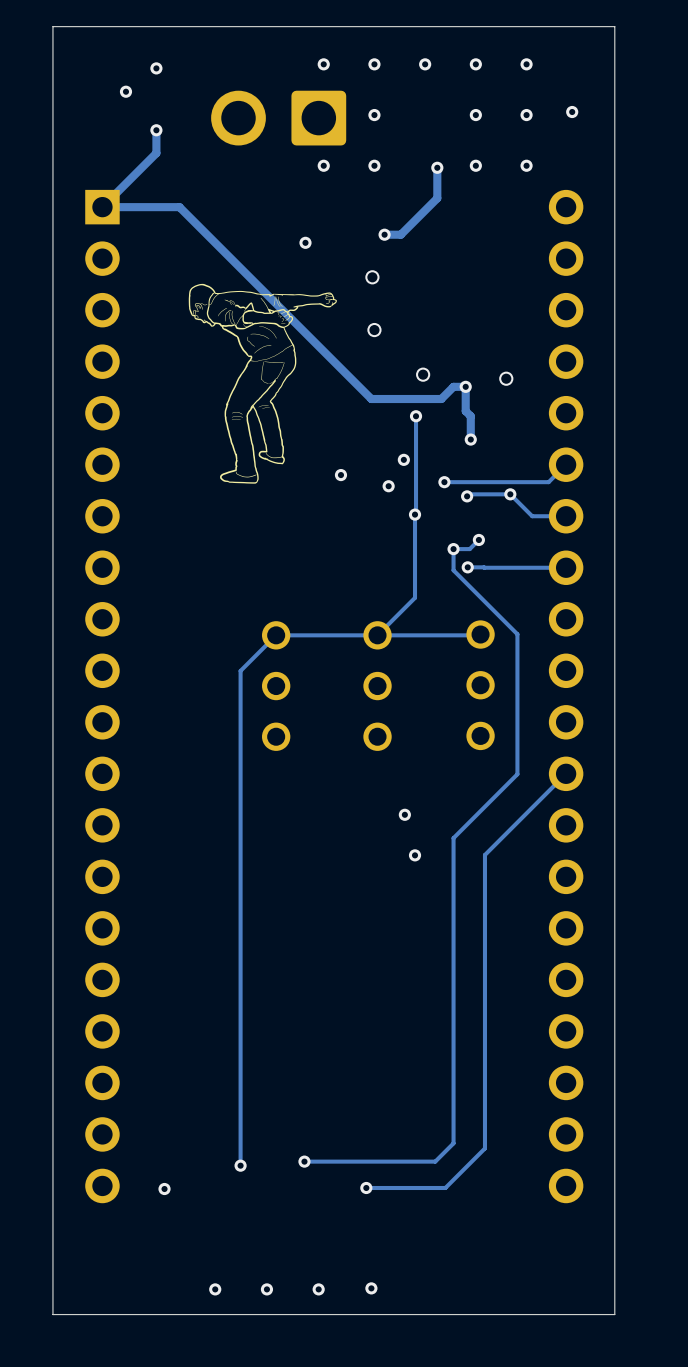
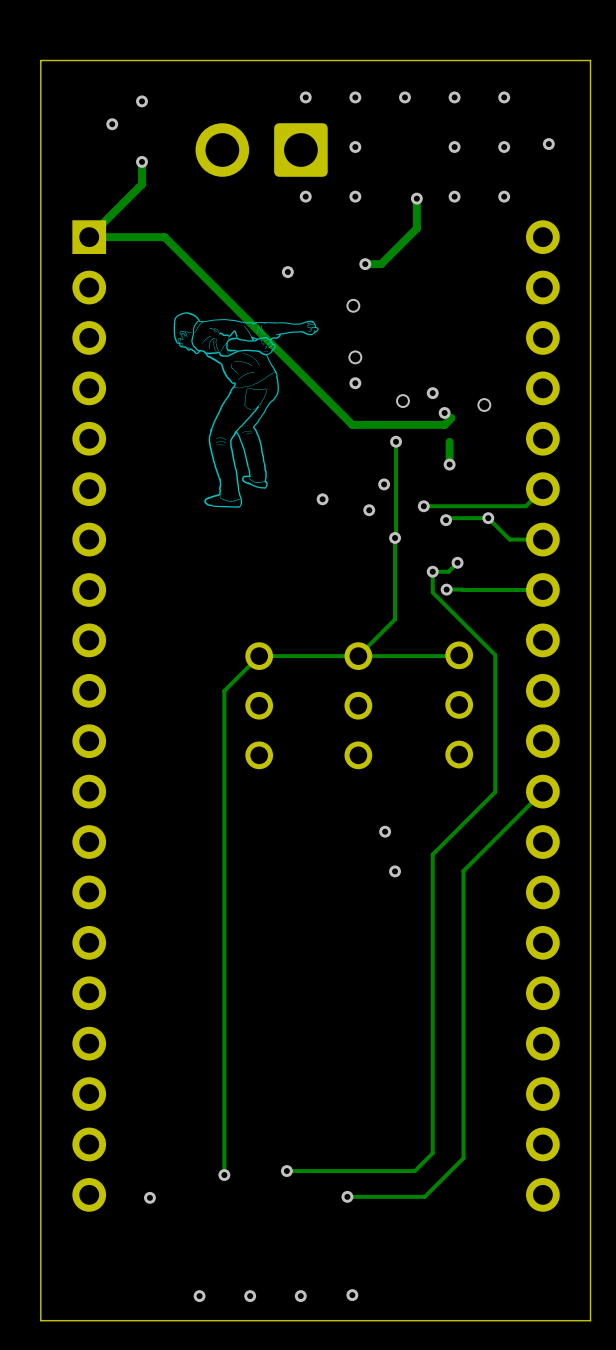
via: none -> (355, 383)
via: none -> (432, 393)
track: (441, 399) (453, 386) (465, 386) (465, 411) (470, 416) -> (420, 424) (444, 424) (451, 417)

